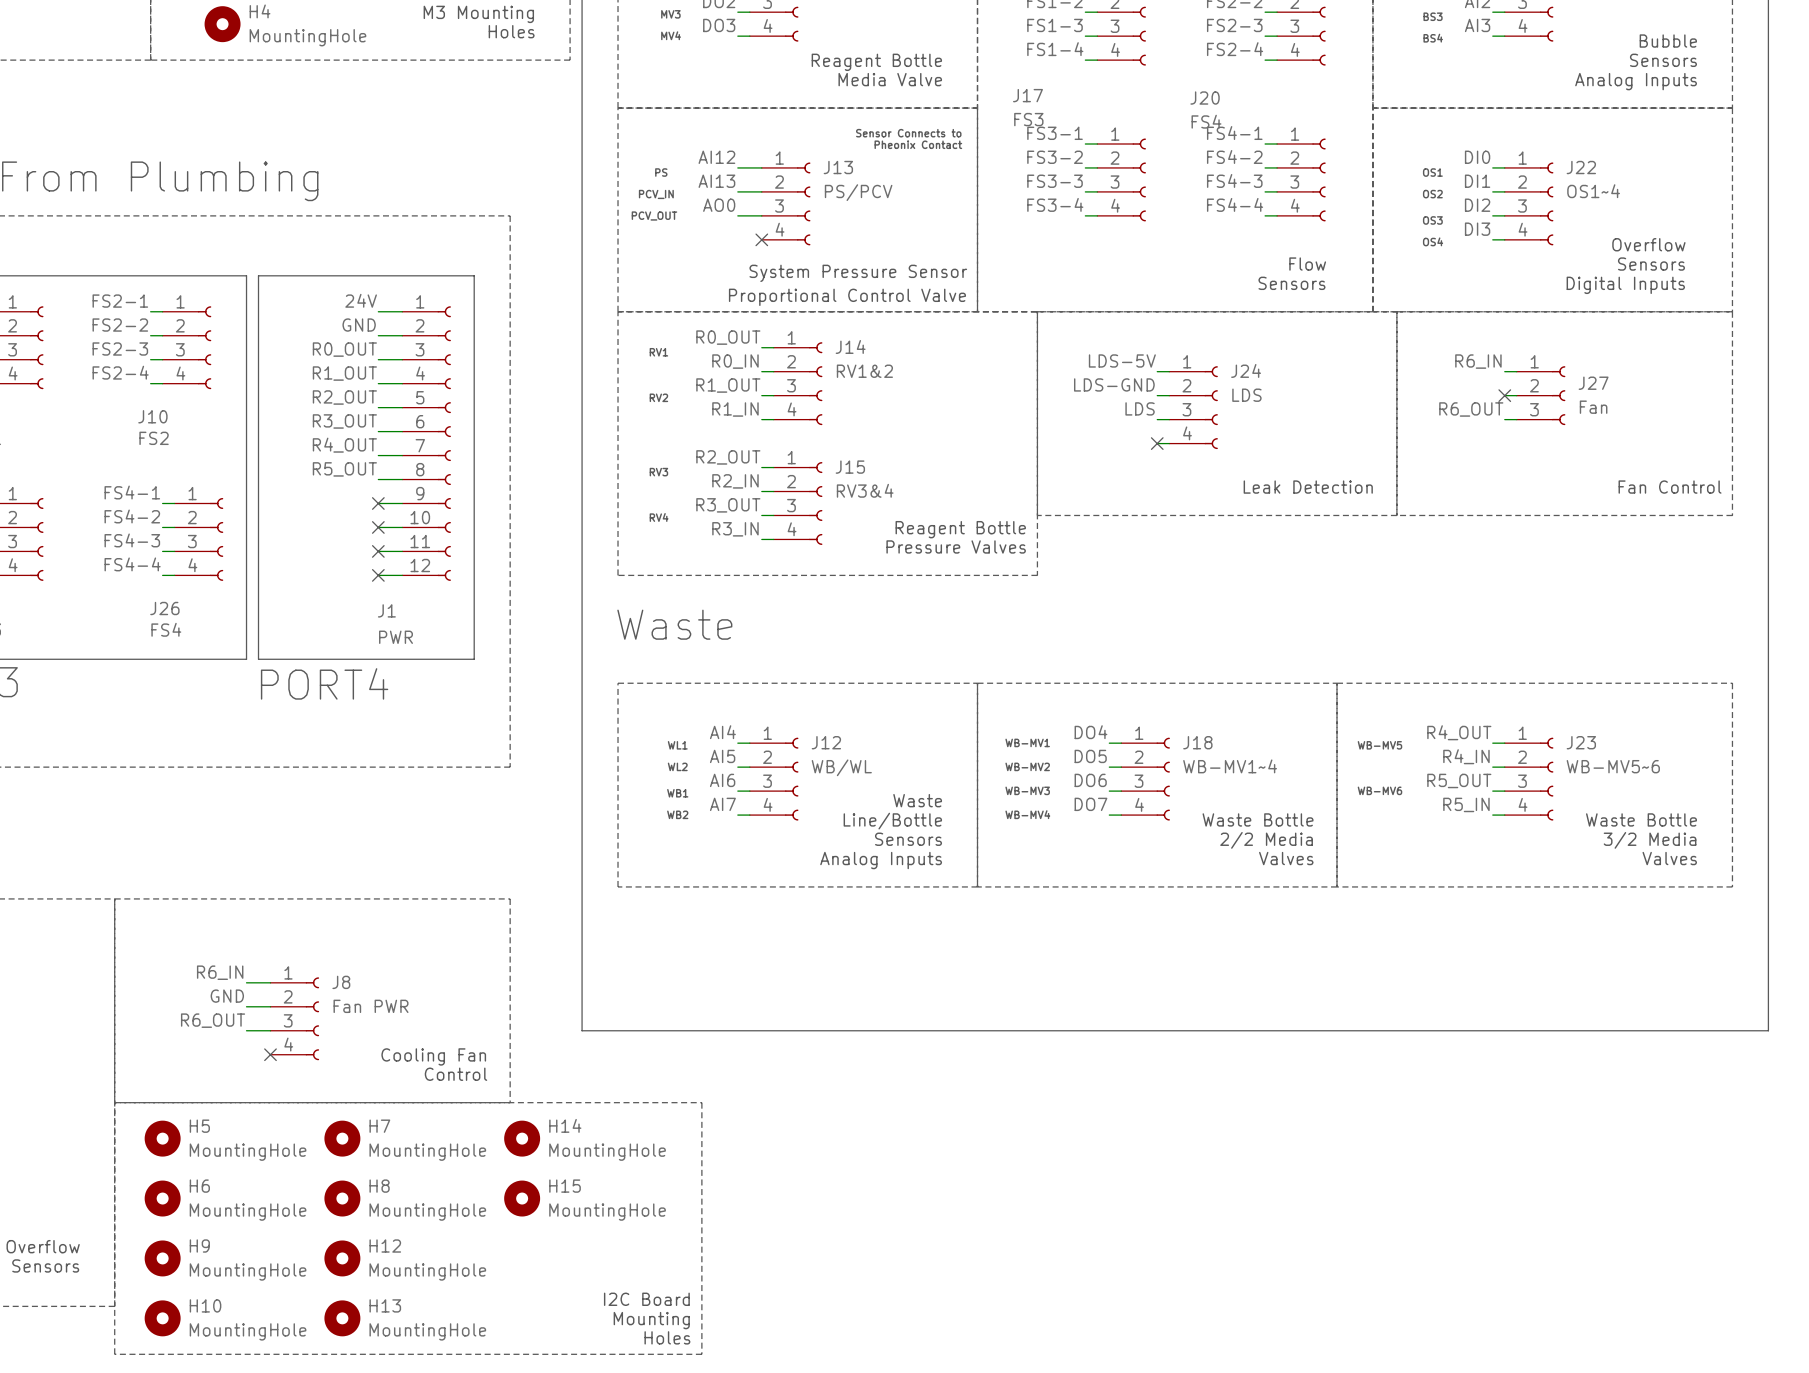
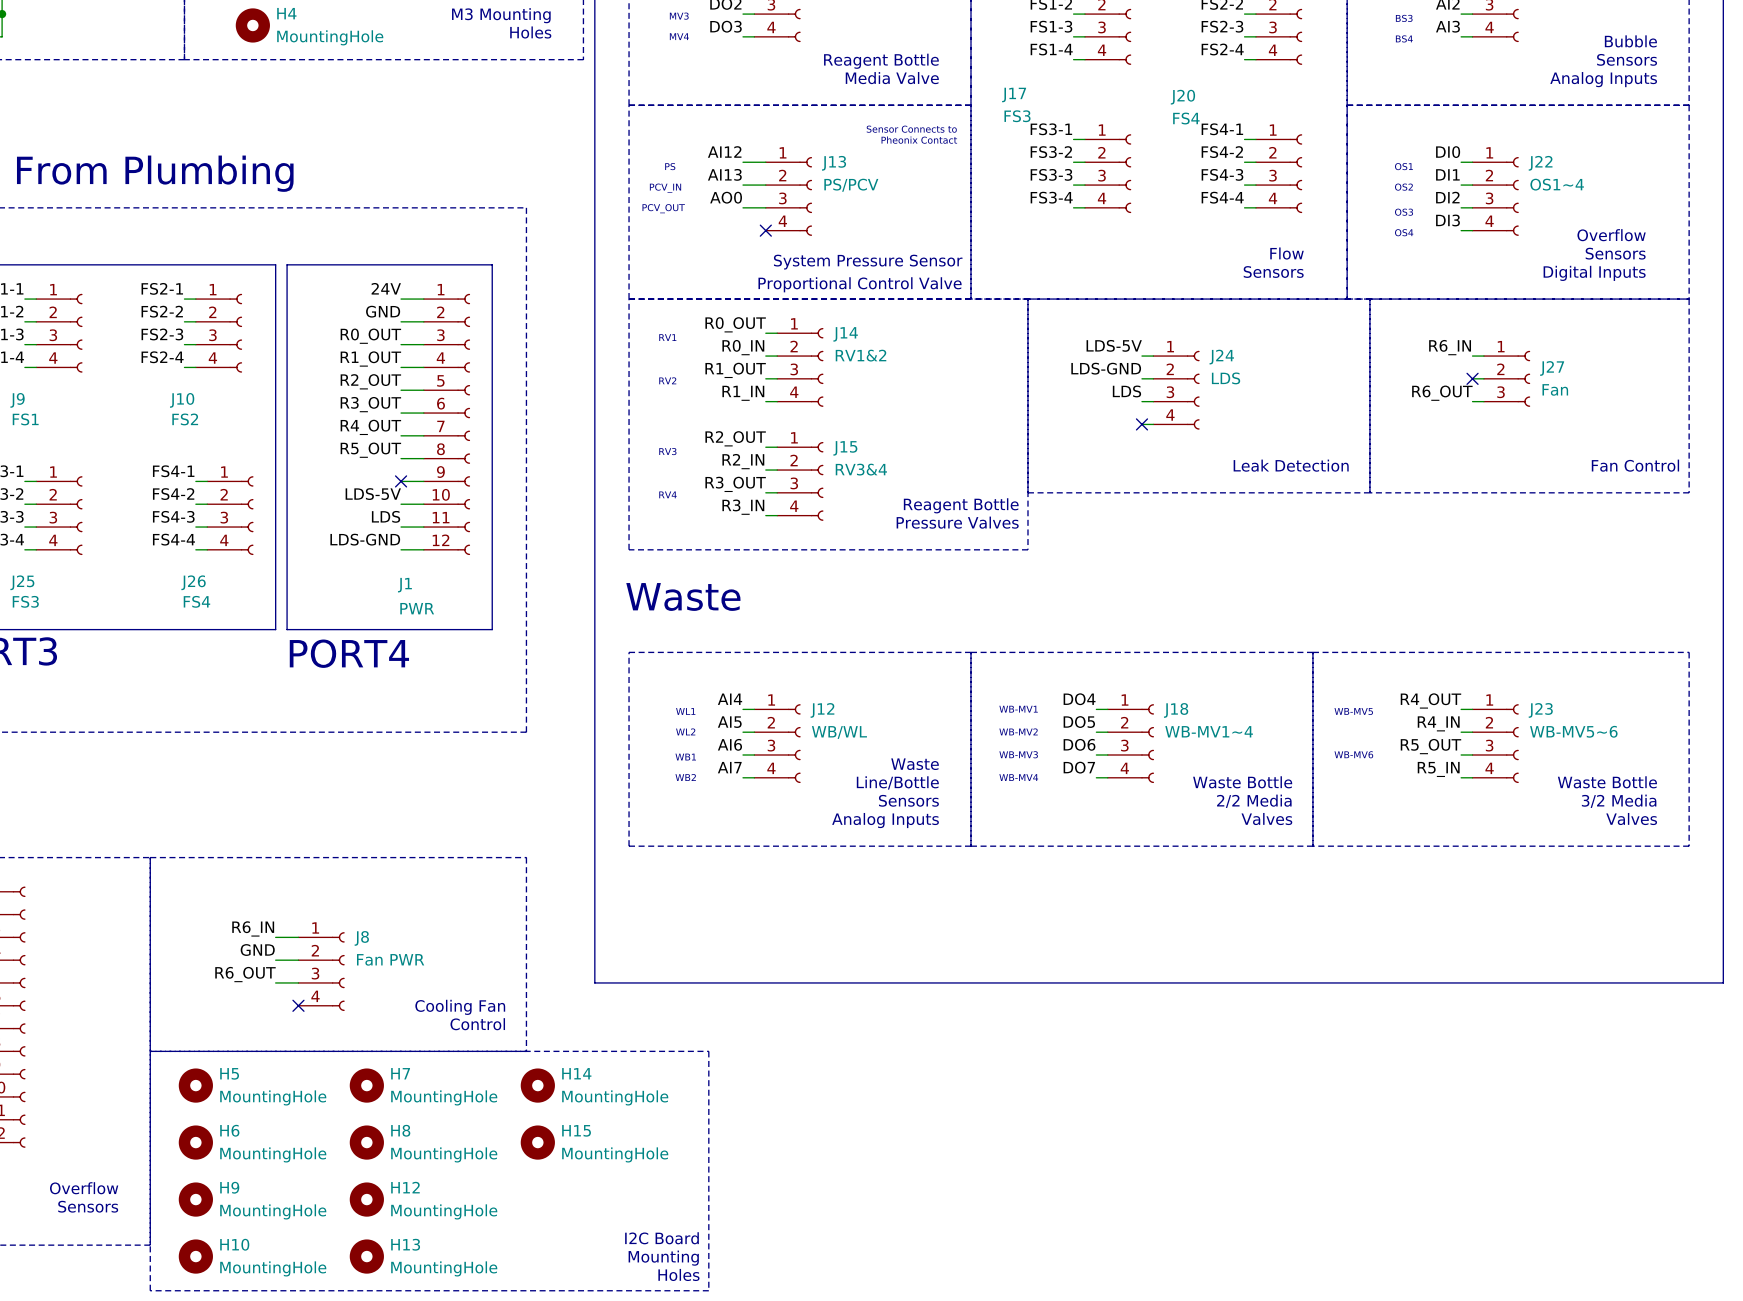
label: none -> LDS-5V (373, 494)
no-connect mark: (378, 527) -> none
label: none -> LDS (386, 516)
no-connect mark: (378, 551) -> none
label: none -> LDS-GND (365, 539)
no-connect mark: (378, 575) -> none

